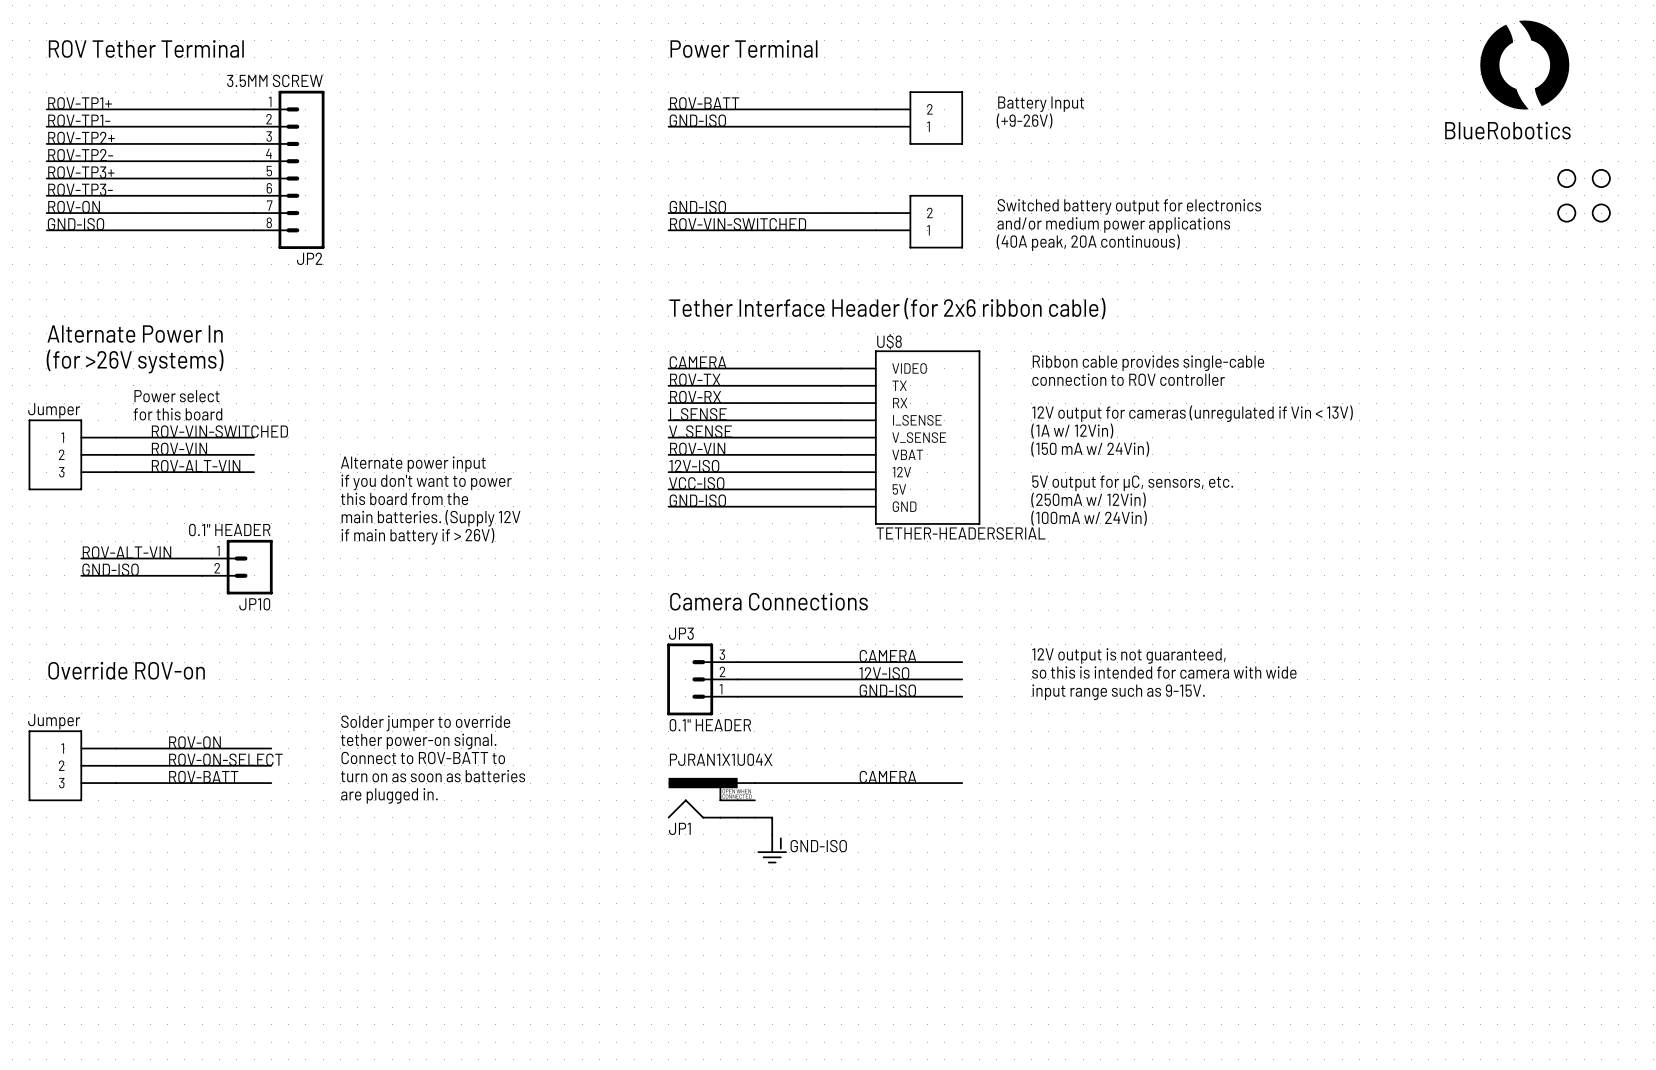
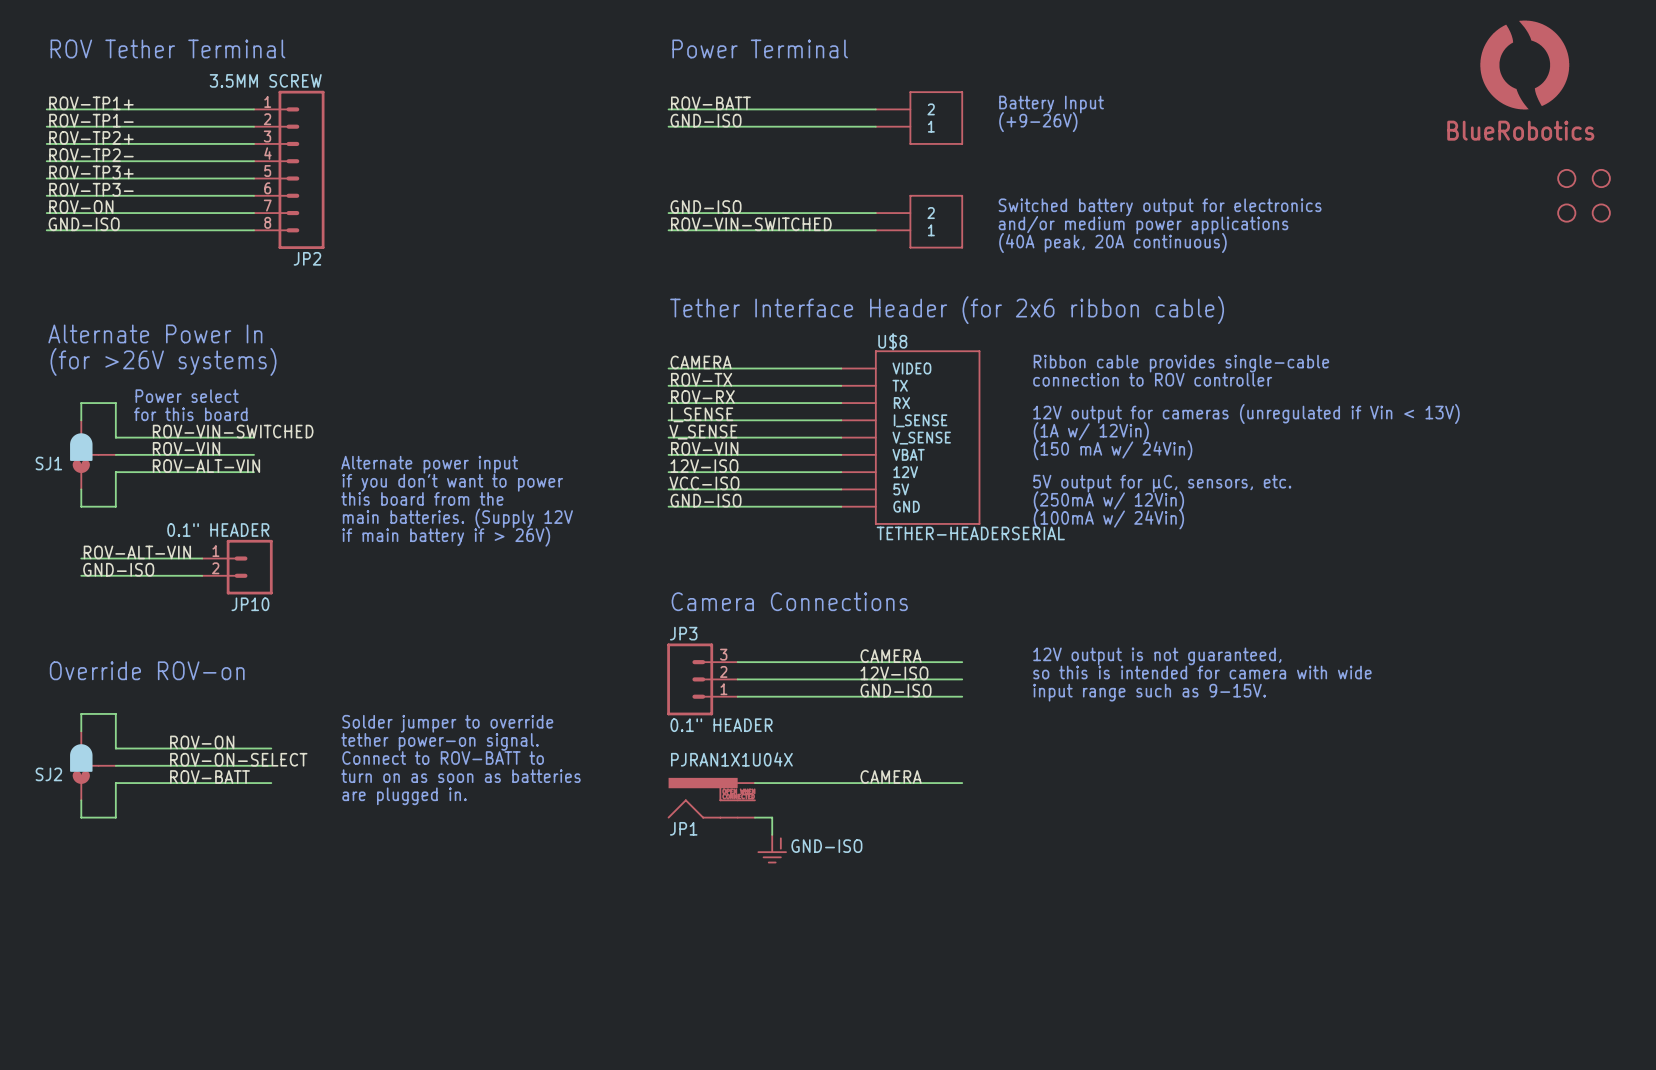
text: Jumper (54, 410) -> none
wire: none -> (81, 420) (81, 403) (115, 403) (115, 437)
part: (72, 454) -> none
SJ1: none -> (92, 454)
wire: none -> (115, 472) (115, 506) (81, 506) (81, 489)
text: Jumper (54, 721) -> none
wire: none -> (81, 731) (81, 713) (115, 713) (115, 748)
part: (72, 765) -> none
SJ2: none -> (92, 765)
wire: none -> (115, 783) (115, 817) (81, 817) (81, 800)

